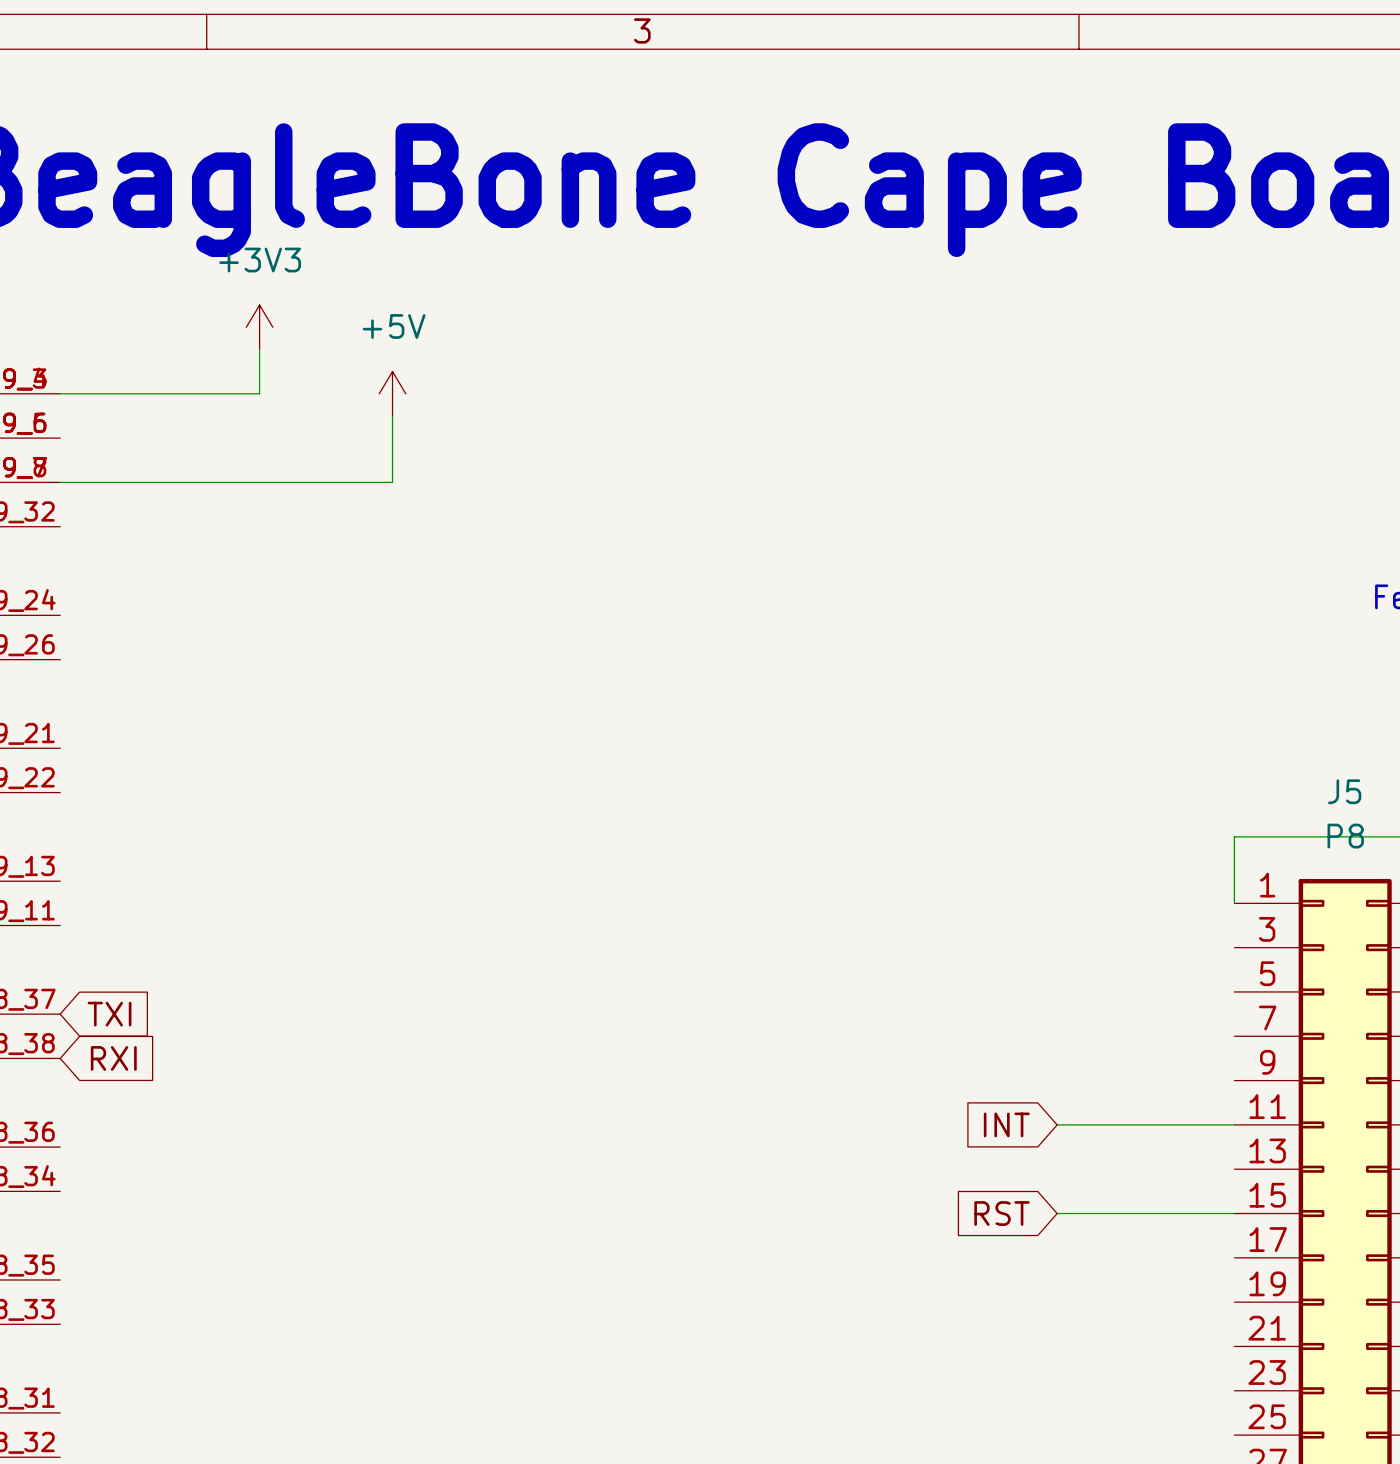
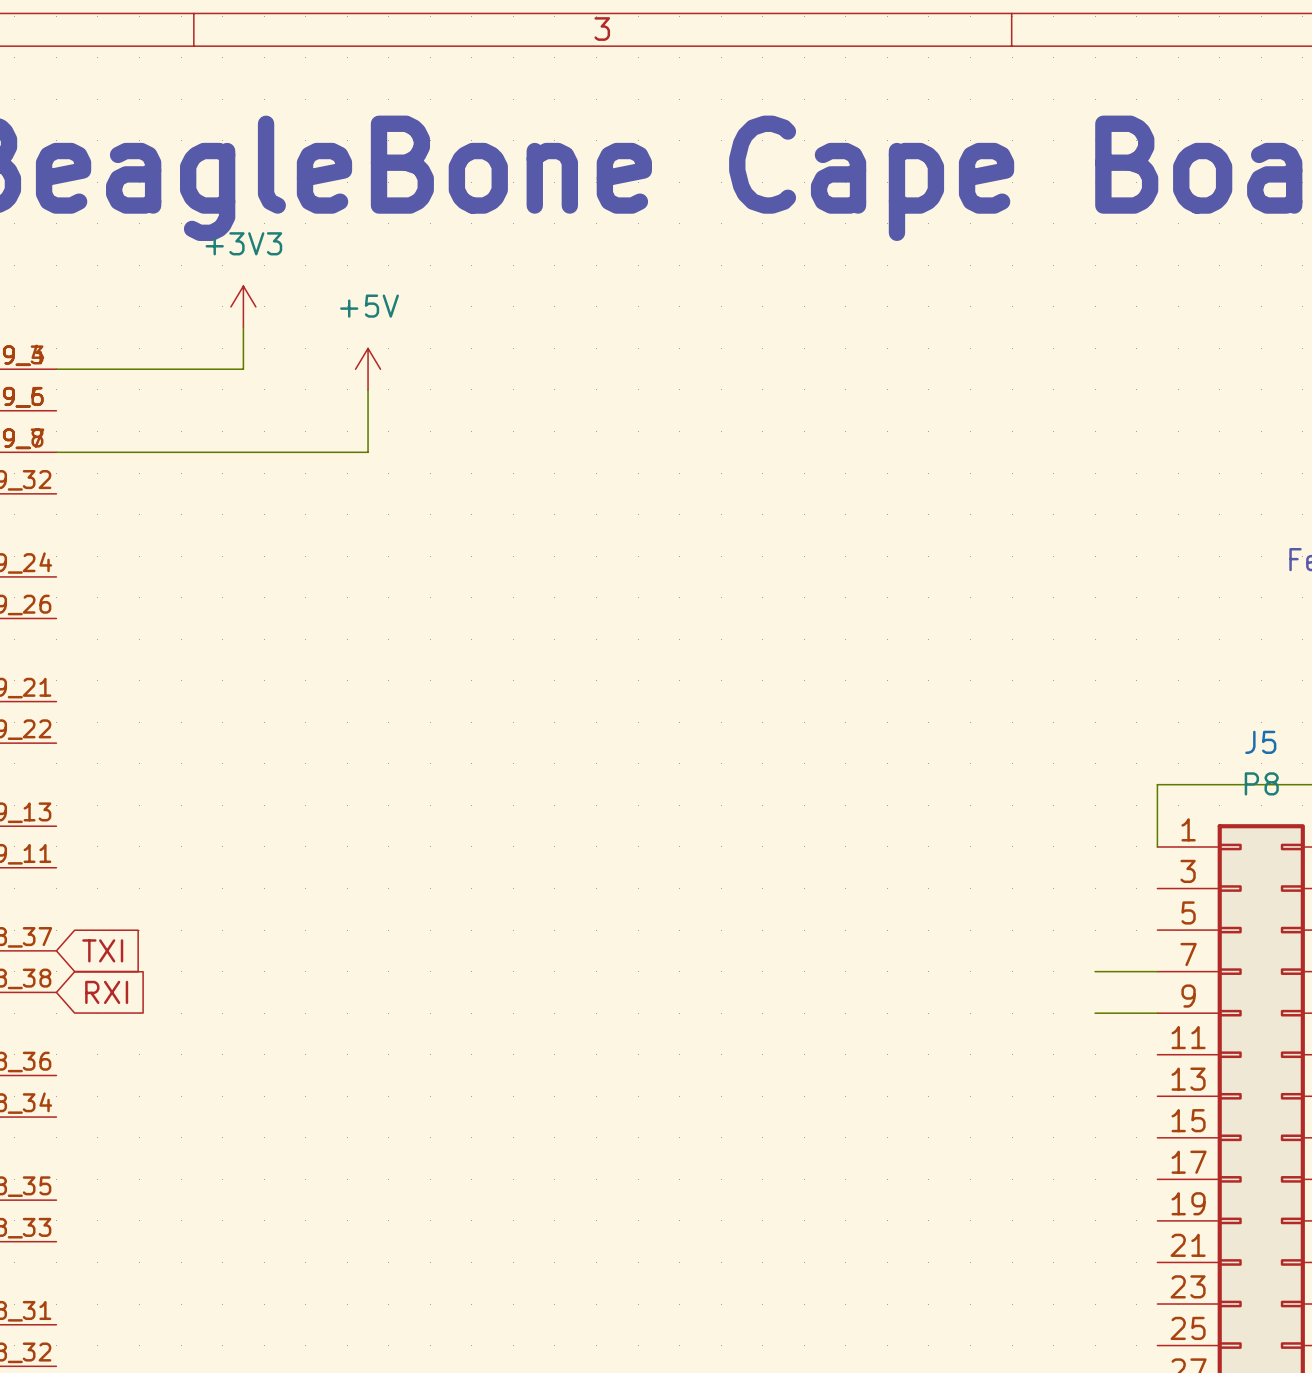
wire: none -> (1095, 971) (1157, 971)
wire: none -> (1095, 1013) (1157, 1013)
global label: INT (1006, 1124) -> none
wire: (1057, 1124) (1234, 1124) -> none
global label: RST (1002, 1213) -> none
wire: (1057, 1213) (1234, 1213) -> none

